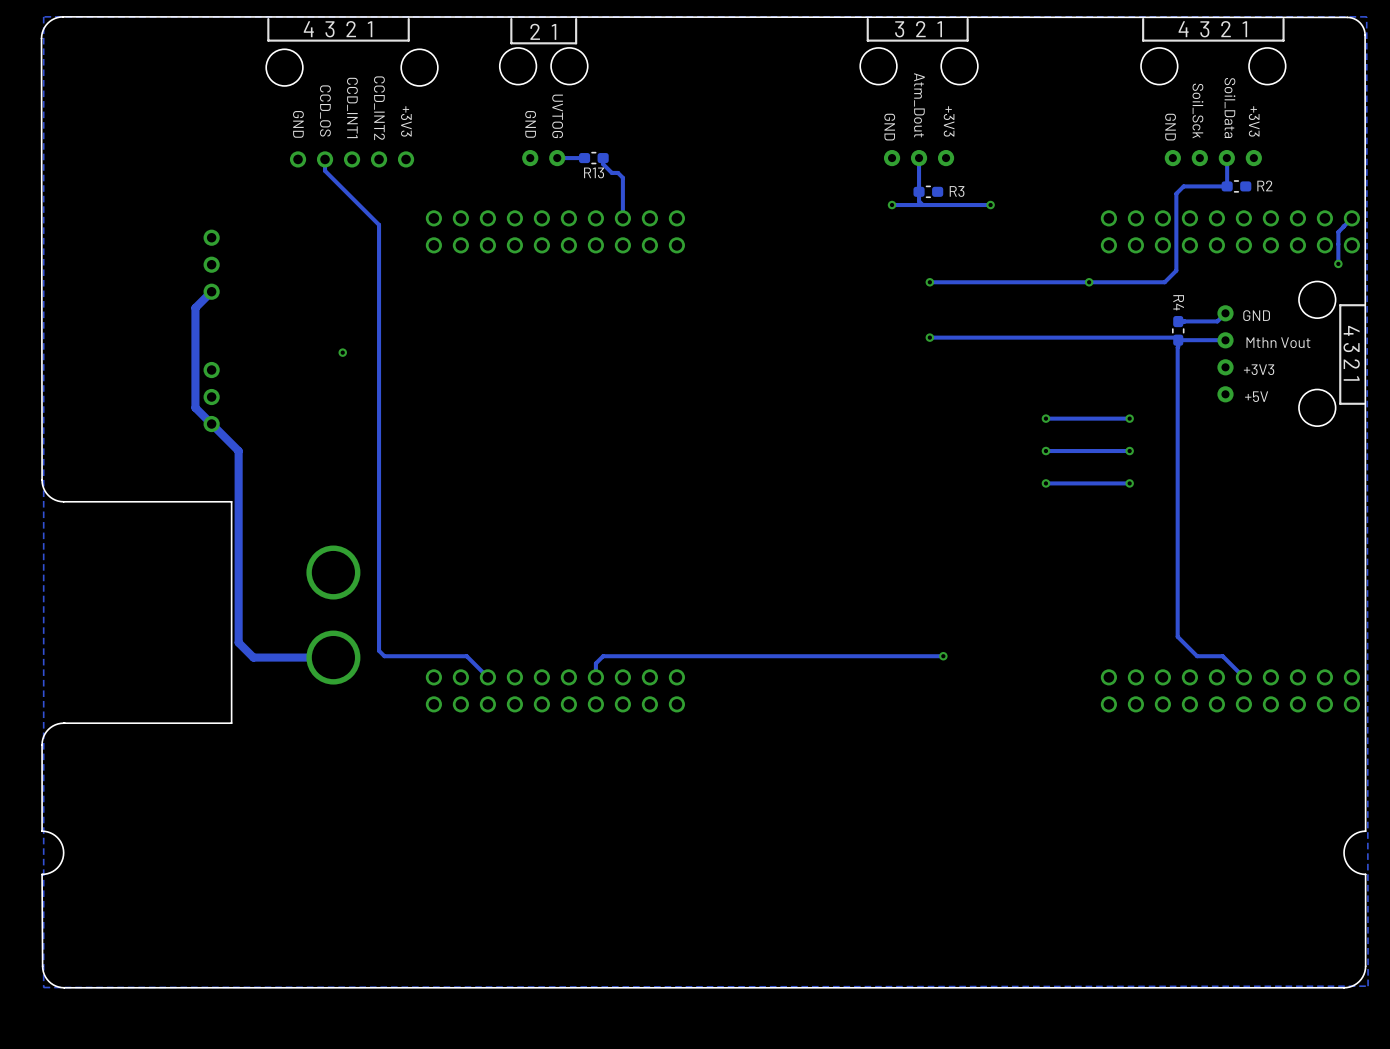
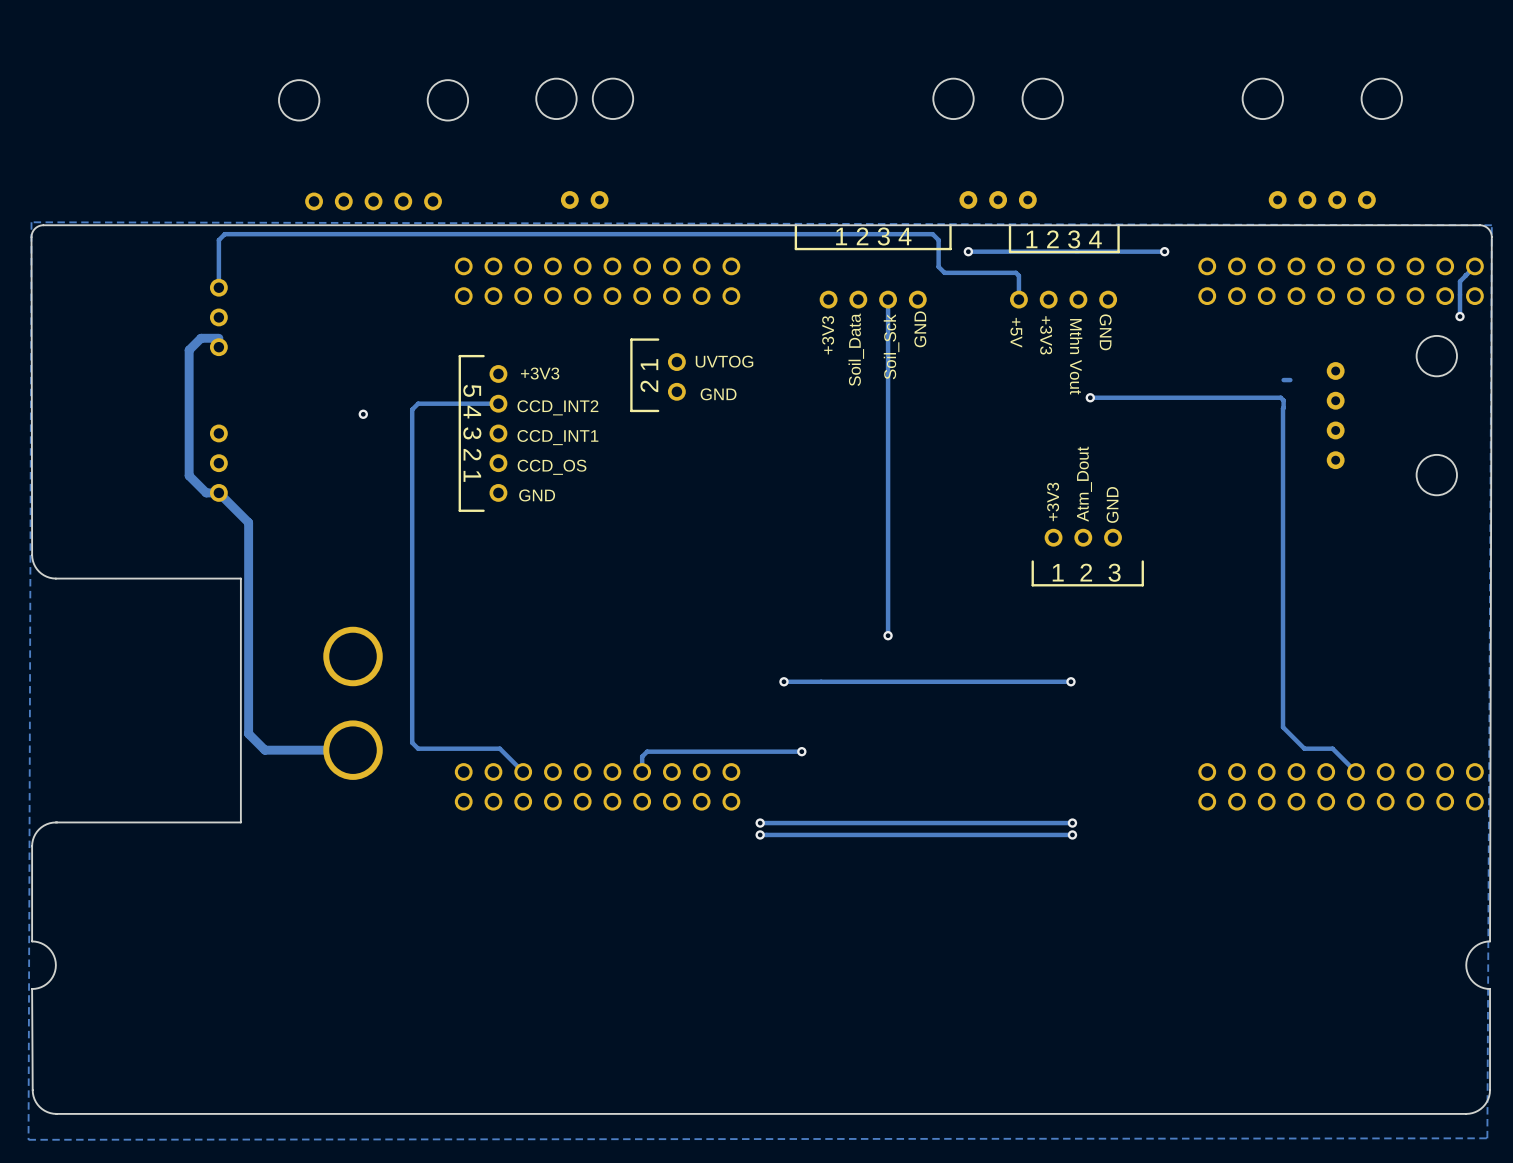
zone outline: (1366, 16) (1368, 986) (43, 987) (43, 16) (1366, 16) -> (31, 222) (1491, 225) (1487, 1138) (28, 1139) (31, 222)
line: (408, 19) (408, 40) (268, 40) (268, 19) -> none
line: (576, 19) (576, 43) (511, 43) (511, 19) -> none
line: (967, 19) (967, 40) (867, 40) (867, 19) -> none
line: (1283, 19) (1283, 40) (1143, 40) (1143, 19) -> none
text: 4 3 2 1 (338, 29) -> none
text: 3 2 1 (918, 29) -> none
text: 4 3 2 1 (1212, 29) -> none
text: 2 1 (543, 31) -> none
text: Atm_Dout (919, 105) -> none
text: CCD_INT1 (352, 107) -> none
text: CCD_INT2 (379, 108) -> none
text: Soil_Data (1229, 108) -> none
text: CCD_OS (325, 110) -> none
text: Soil_Sck (1197, 110) -> none
text rotation: 0° (557, 116) -> 90° counterclockwise (724, 361)
text position: UVTOG (557, 116) -> UVTOG (724, 361)
text: +3V3 (406, 121) -> none
text: +3V3 (949, 121) -> none
text: +3V3 (1254, 121) -> none
text: GND (298, 124) -> none
text: GND (530, 124) -> none
text: GND (889, 127) -> none
text: GND (1170, 127) -> none
track: (584, 158) (557, 158) -> none
R13: (593, 158) -> none
track: (603, 158) (603, 164) (611, 172) (617, 172) (622, 177) (622, 218) -> none
track: (919, 158) (919, 201) (922, 205) -> none
track: (1226, 158) (1227, 186) (1183, 186) (1176, 193) (1176, 270) (1164, 282) (929, 282) -> none
track: (325, 159) (325, 170) (379, 224) (379, 650) (384, 656) (392, 656) -> (498, 403) (418, 403) (412, 409) (412, 742) (418, 748)
line: none -> (950, 225) (950, 249) (795, 249) (795, 225)
line: none -> (1118, 225) (1118, 252) (1010, 252) (1010, 225)
R2: (1236, 186) -> none
text: none -> 1 2 3 4 (873, 236)
R3: (928, 191) -> none
text: none -> 1 2 3 4 (1064, 239)
via: (990, 205) -> none
track: none -> (1164, 251) (1076, 251)
via: none -> (1164, 251)
track: none -> (218, 278) (218, 240) (224, 234) (932, 234) (938, 240) (938, 266) (944, 272) (1015, 272) (1018, 275) (1018, 299)
part: none -> (873, 299)
track: none -> (888, 299) (888, 635)
part: none -> (1063, 299)
text: none -> GND (920, 329)
text: none -> +5V (1016, 332)
text: none -> GND (1105, 332)
text: none -> +3V3 (1046, 335)
text: none -> +3V3 (828, 335)
via: (929, 282) -> none
via: (1089, 282) -> none
line: none -> (658, 339) (631, 339) (631, 410) (658, 410)
track: (211, 291) (195, 307) (195, 407) (211, 424) -> (218, 338) (201, 338) (189, 350) (189, 475) (206, 492) (218, 492)
text: none -> Soil_Sck (891, 346)
text: none -> Soil_Data (856, 349)
line: none -> (483, 356) (459, 356) (459, 510) (483, 510)
text: none -> Mthn Vout (1076, 356)
line: (1364, 305) (1340, 305) (1340, 403) (1364, 403) -> none
track: (1225, 313) (1217, 321) (1184, 321) -> none
text: none -> +3V3 (540, 373)
text: GND (1256, 315) -> none
text: none -> 2 1 (649, 375)
part: none -> (676, 376)
R4: (1178, 330) -> none
text: none -> GND (718, 394)
via: (929, 337) -> none
track: (1002, 337) (929, 337) -> none
via: none -> (1090, 397)
track: (1225, 340) (1178, 340) -> none
text: Mthn Vout (1278, 342) -> none
text: none -> CCD_INT2 (557, 407)
text: 4 3 2 1 (1351, 353) -> none
text: none -> 5 4 3 2 1 (472, 433)
text: +3V3 (1259, 369) -> none
part: none -> (498, 433)
text: none -> CCD_INT1 (557, 437)
text: +5V (1256, 396) -> none
text: none -> CCD_OS (552, 467)
text: none -> Atm_Dout (1084, 484)
via: (1045, 418) -> none
track: (1129, 418) (1045, 418) -> none
via: (1129, 418) -> none
text: none -> GND (537, 495)
text: none -> +3V3 (1053, 501)
text: none -> GND (1112, 504)
via: (1045, 451) -> none
track: (1129, 451) (1045, 451) -> none
via: (1129, 451) -> none
part: none -> (1083, 537)
board edge: (42, 480) (41, 38) (46, 25) (54, 18) (63, 16) (1351, 18) (1361, 24) (1365, 35) (1365, 831) -> (32, 554) (31, 237) (33, 229) (40, 225) (1483, 225) (1489, 229) (1491, 237) (1490, 941)
via: (1045, 483) -> none
track: (1129, 483) (1045, 483) -> none
via: (1129, 483) -> none
line: none -> (1142, 561) (1142, 585) (1032, 585) (1032, 561)
text: none -> 1 2 3 (1086, 572)
via: none -> (888, 635)
via: none -> (783, 681)
track: none -> (1070, 681) (783, 681)
via: none -> (1070, 681)
track: (943, 656) (603, 656) (600, 658) -> (801, 751) (647, 751)
via: (943, 656) -> none
via: none -> (801, 751)
via: none -> (760, 823)
track: none -> (1072, 823) (758, 823)
via: none -> (1072, 823)
via: none -> (760, 834)
track: none -> (1072, 834) (760, 834)
via: none -> (1072, 834)

